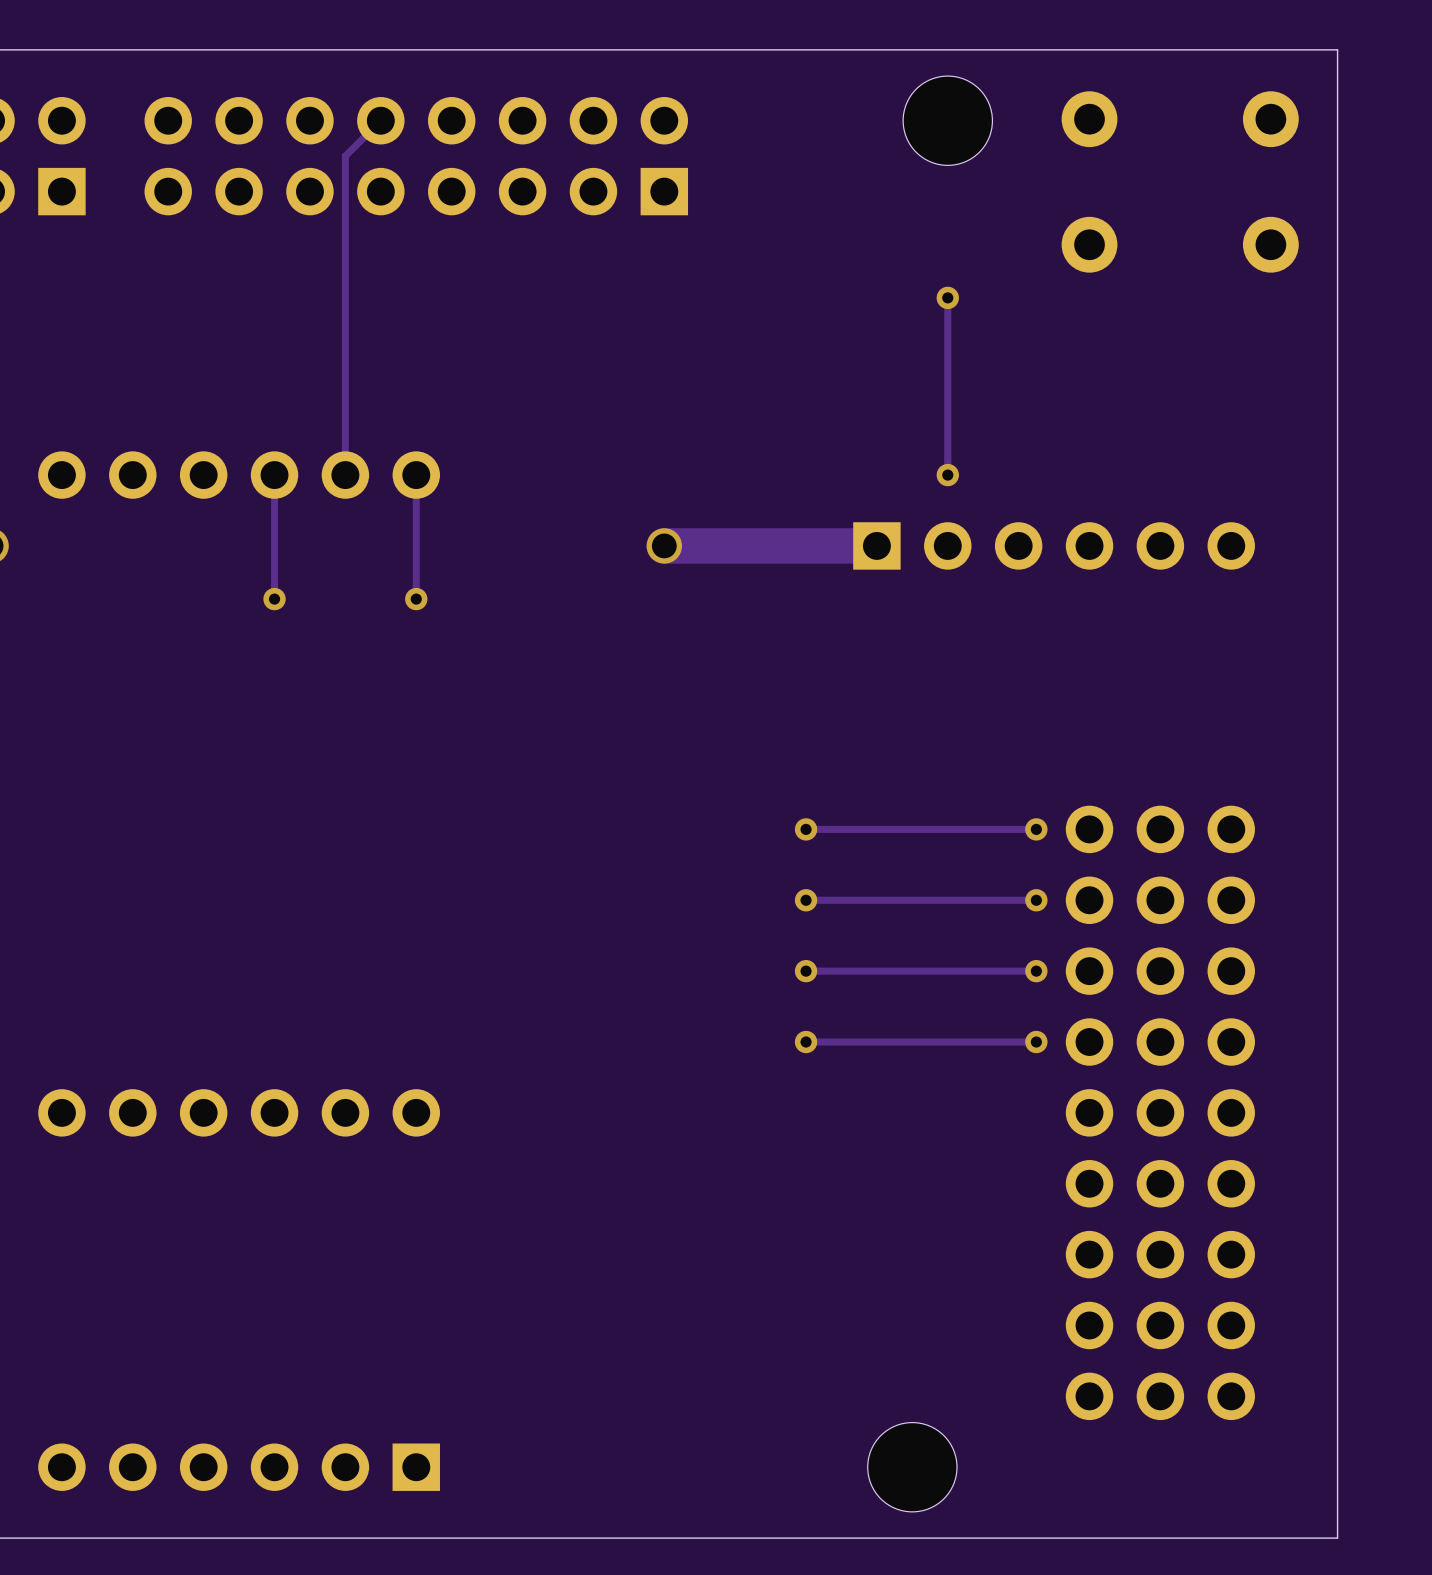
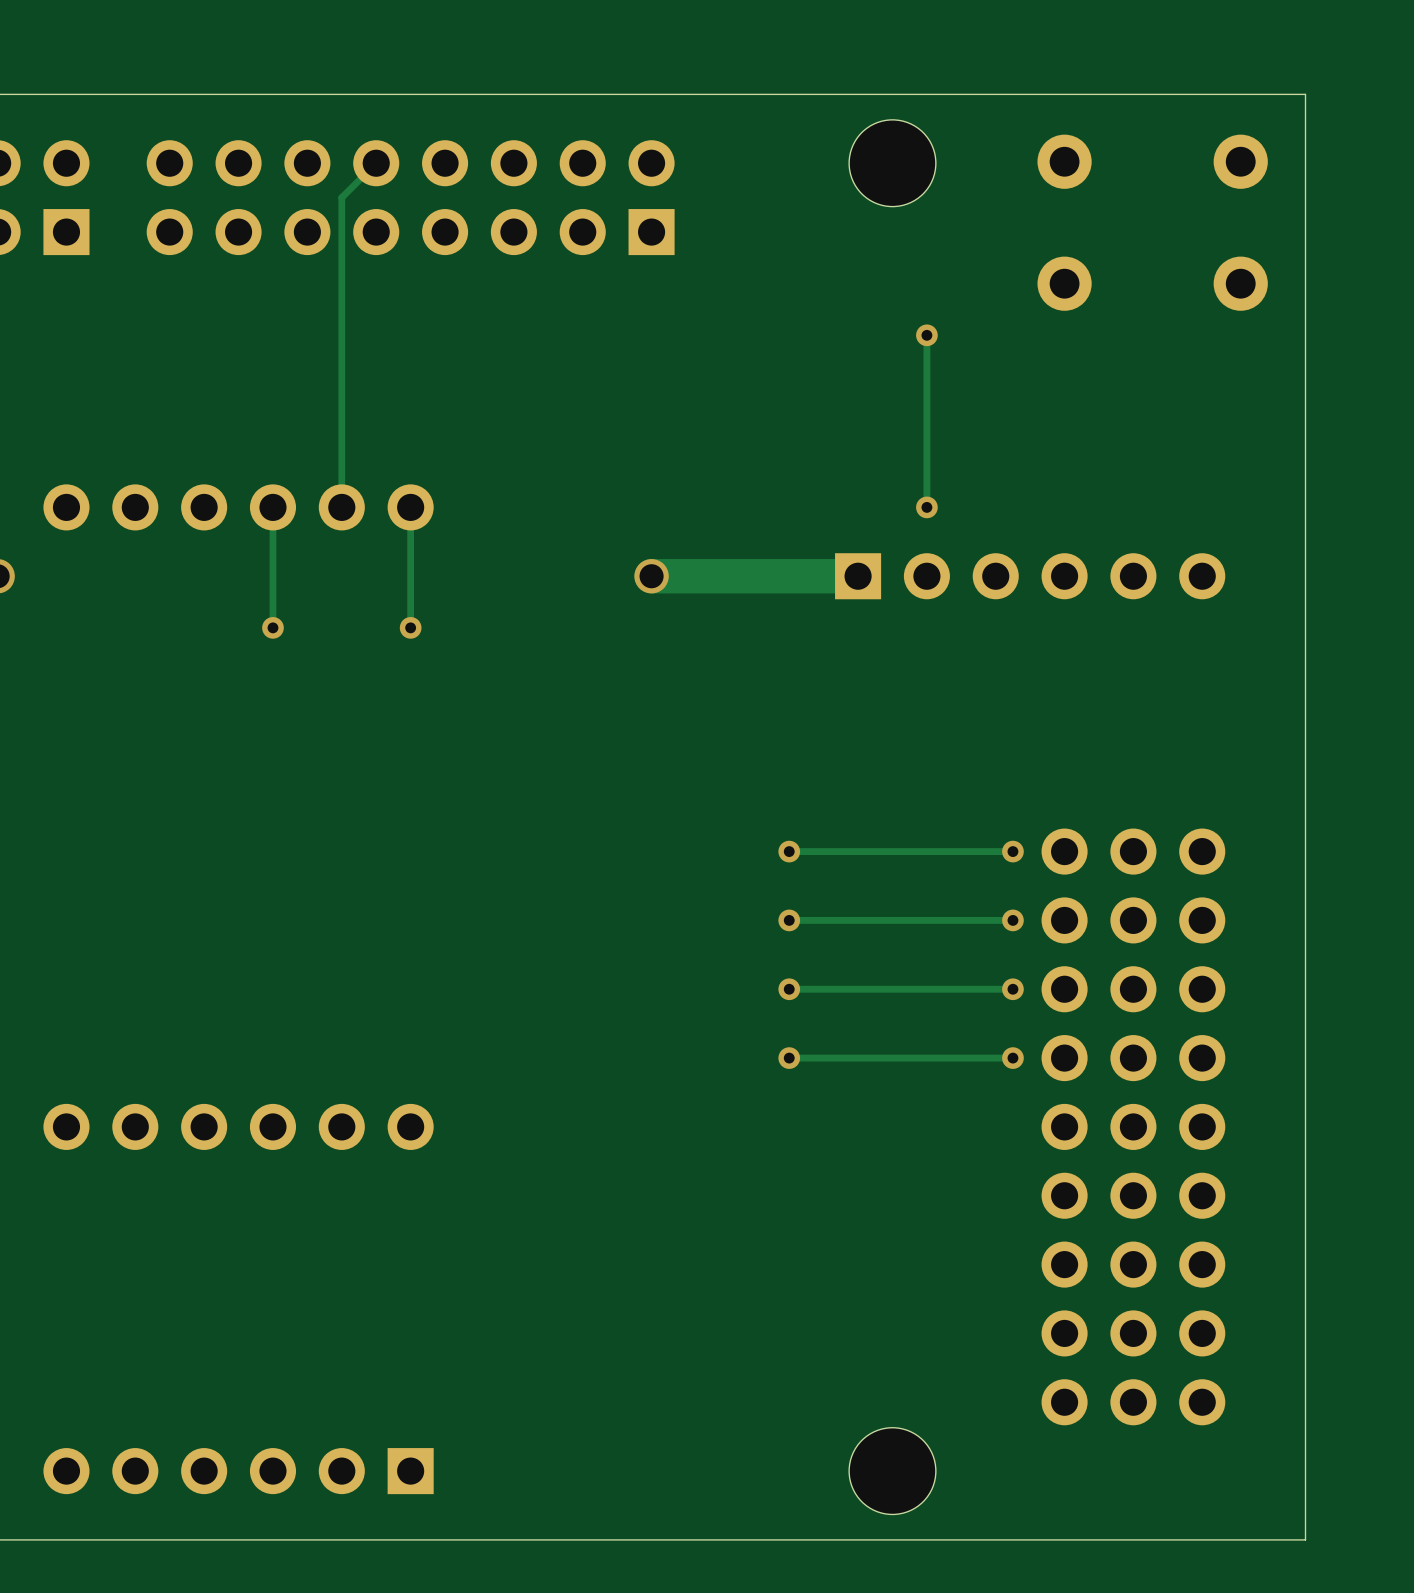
part position: (947, 120) -> (892, 163)

